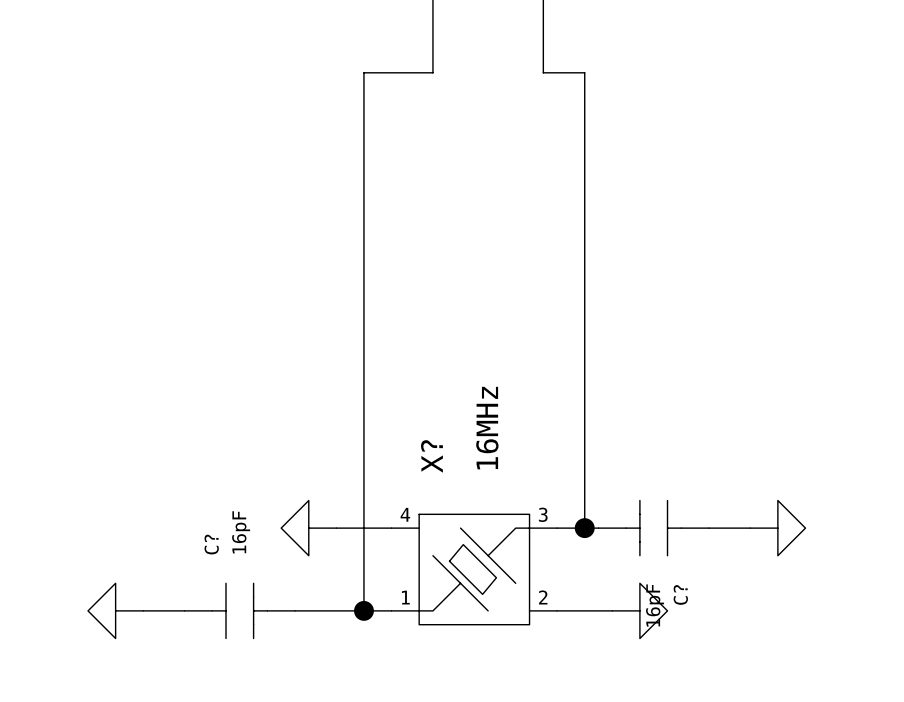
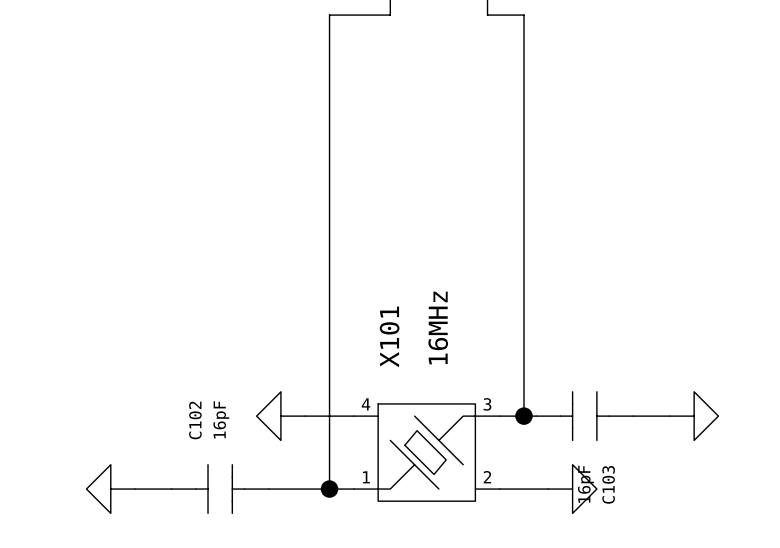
X? name: X? (431, 456) -> X101 (389, 336)
C? name: C? (211, 544) -> C102 (195, 420)
C? name: C? (680, 594) -> C103 (608, 484)

